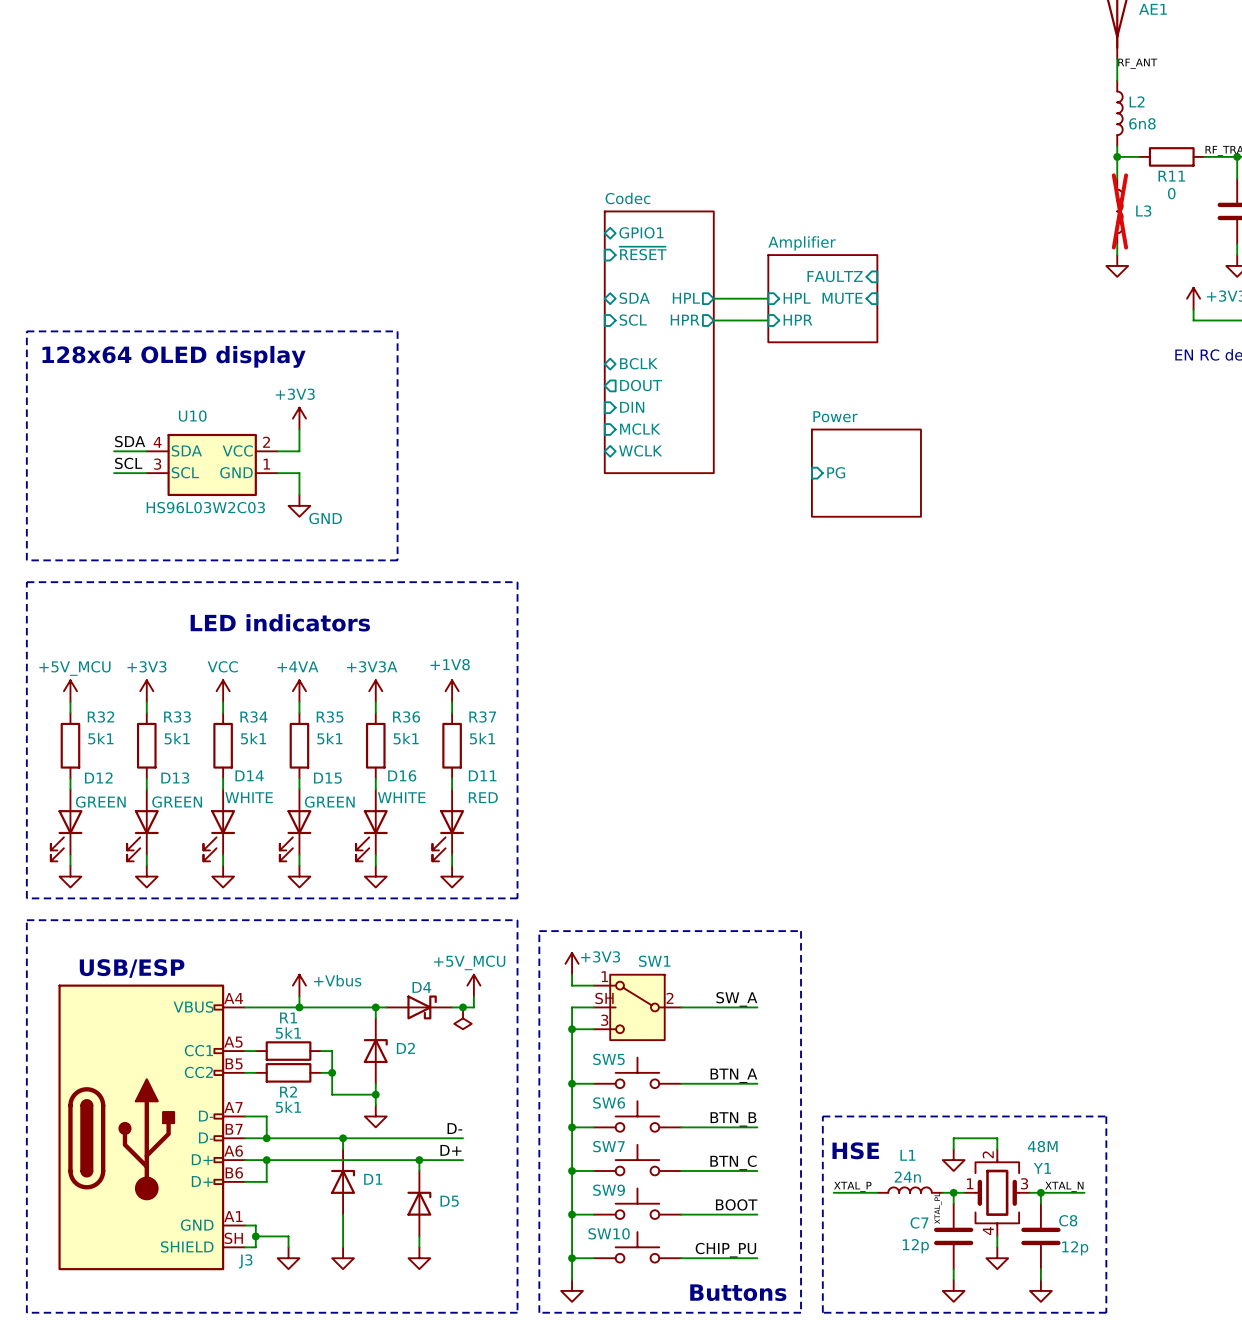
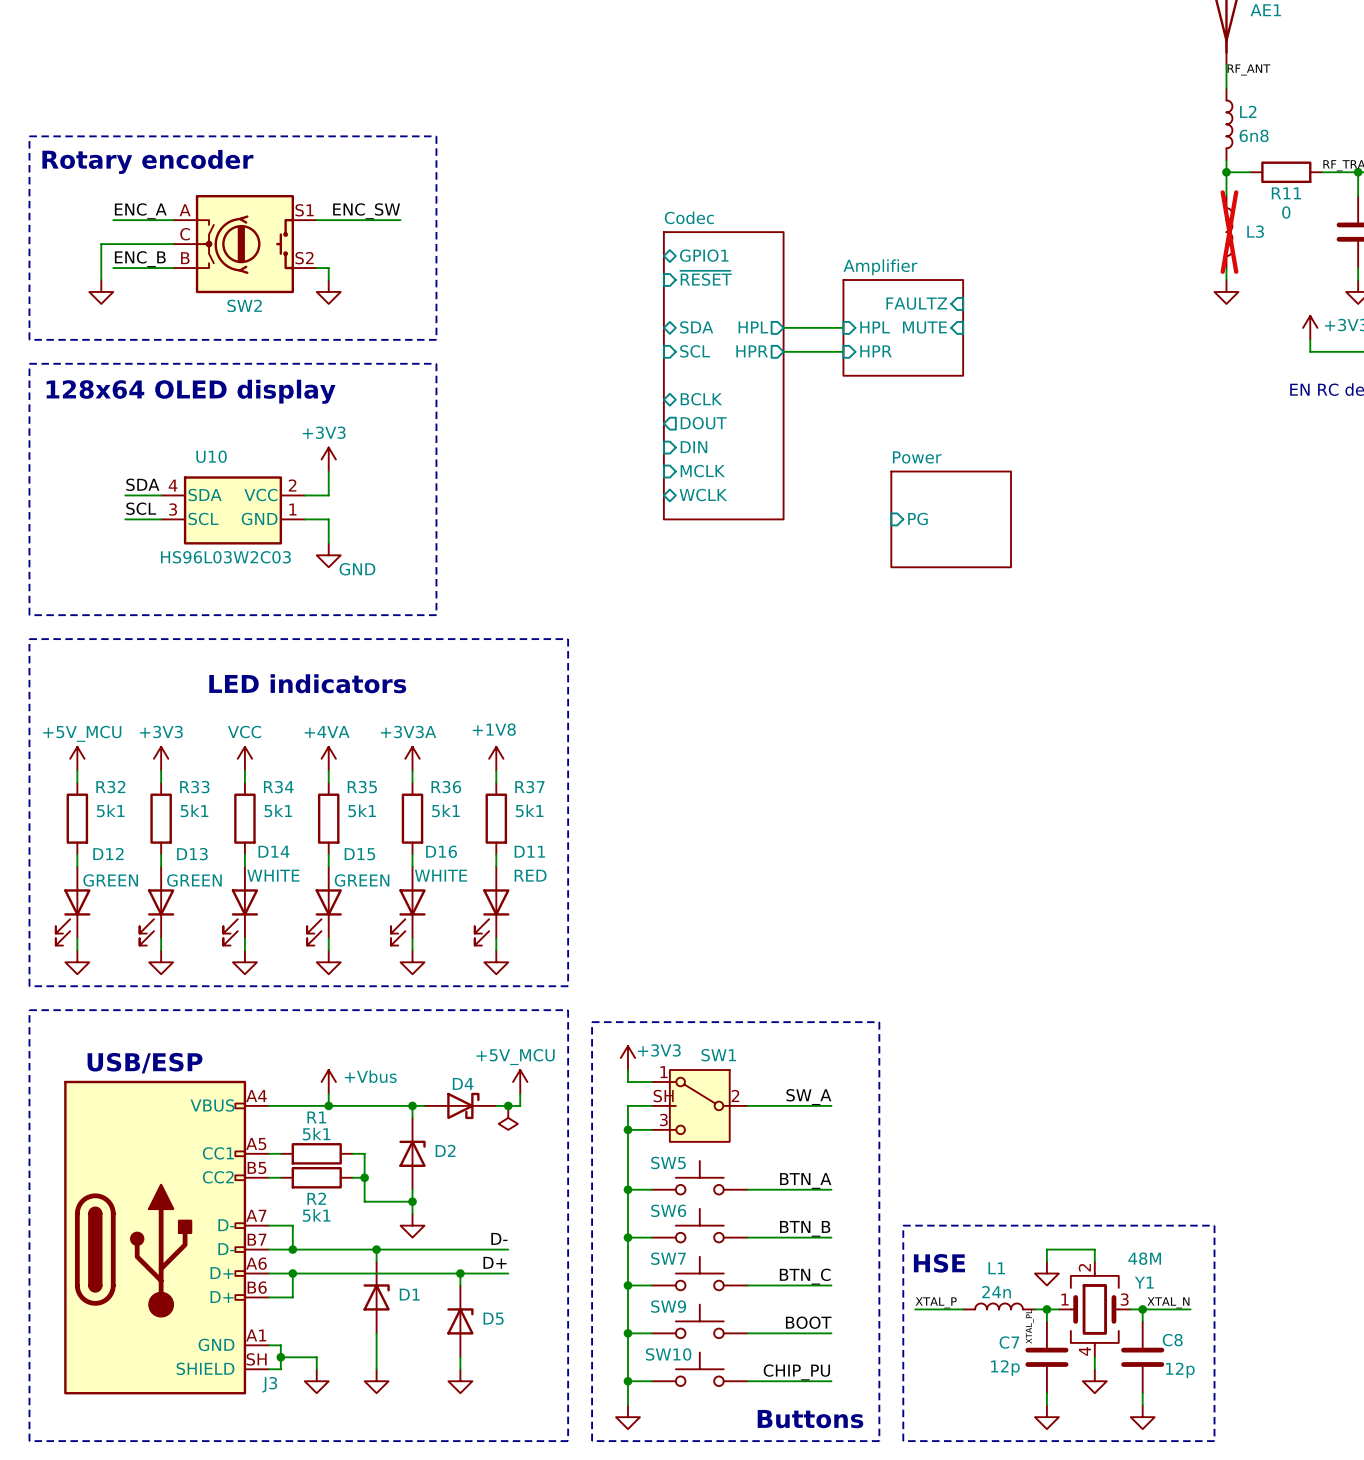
line: none -> (29, 136) (436, 136) (436, 339) (29, 339) (29, 136)
text: none -> Rotary encoder (147, 161)
label: none -> ENC_A (140, 211)
label: none -> ENC_SW (366, 211)
wire: none -> (113, 220) (173, 220)
wire: none -> (316, 220) (400, 220)
wire: none -> (173, 244) (101, 244) (101, 280)
SW2: none -> (244, 244)
label: none -> ENC_B (140, 259)
wire: none -> (113, 268) (173, 268)
wire: none -> (316, 268) (328, 268) (328, 280)
power symbol: none -> (101, 291)
power symbol: none -> (328, 291)

